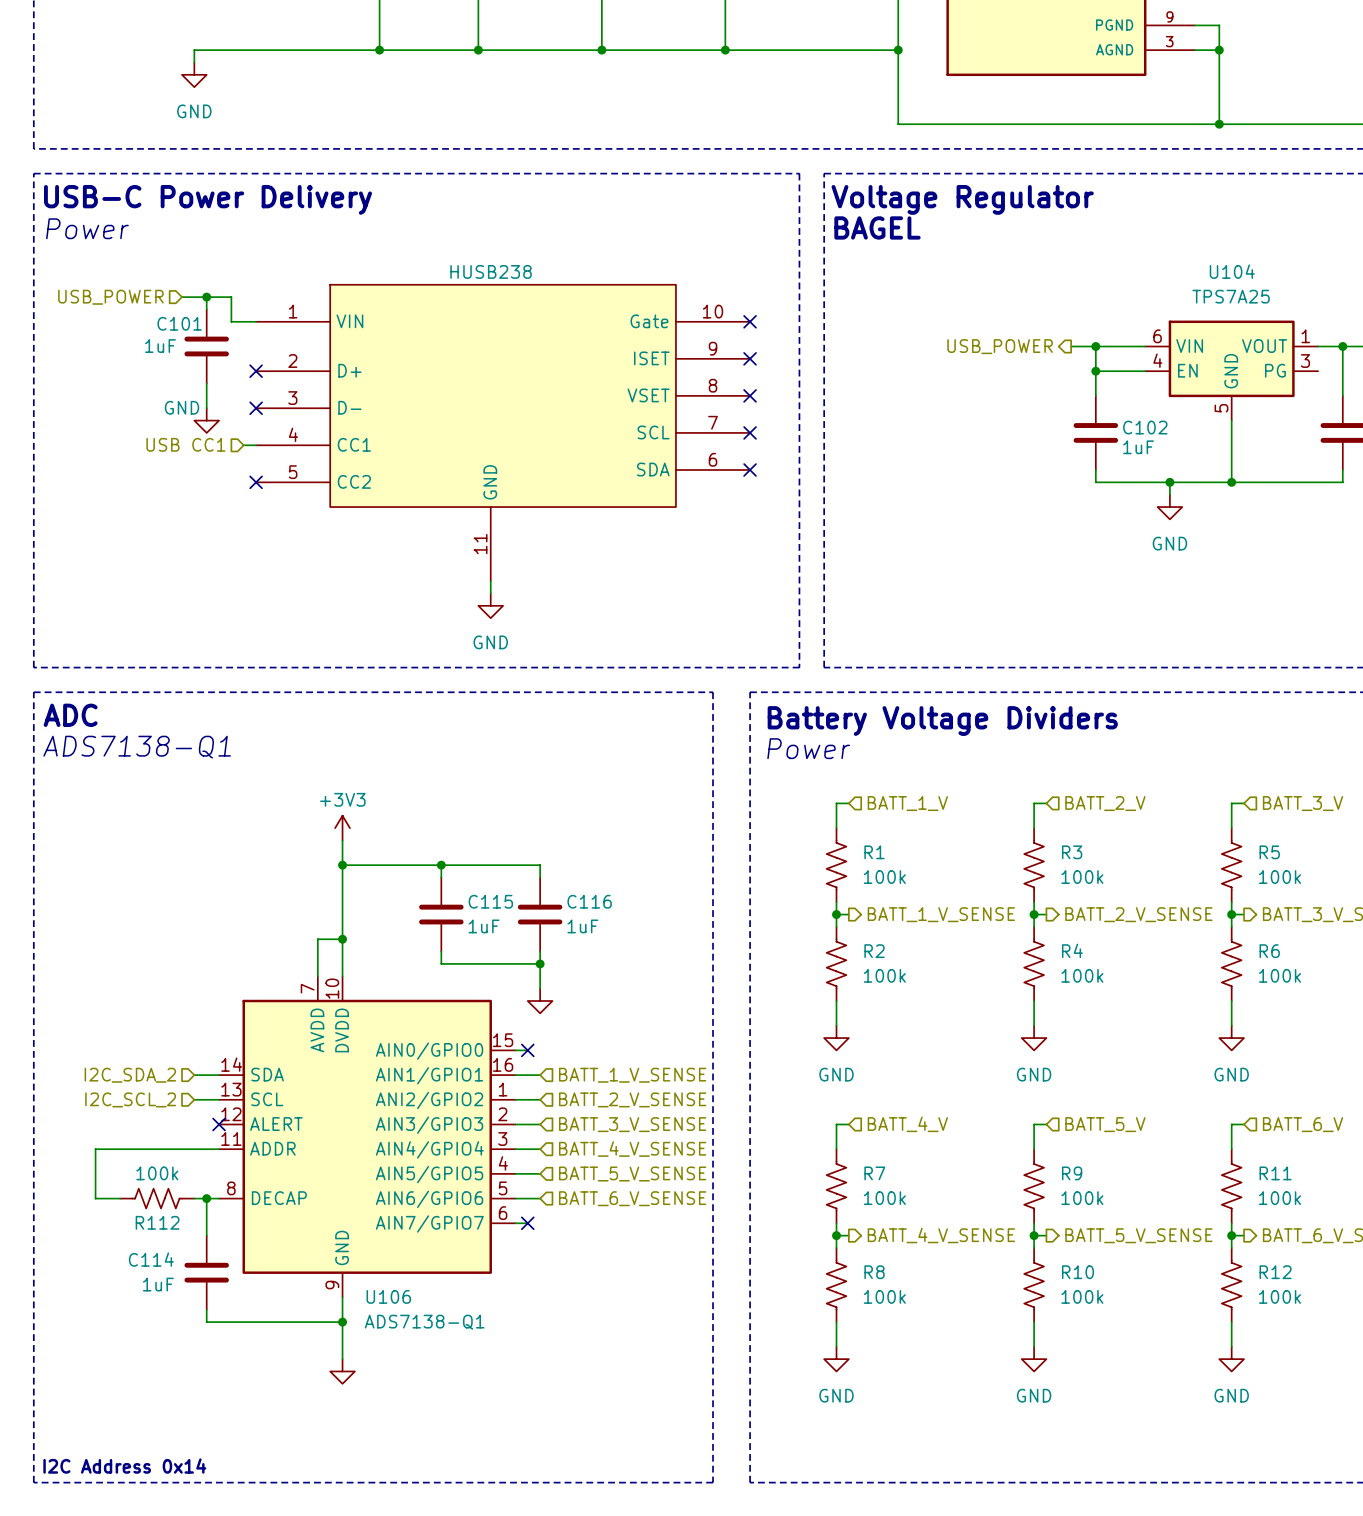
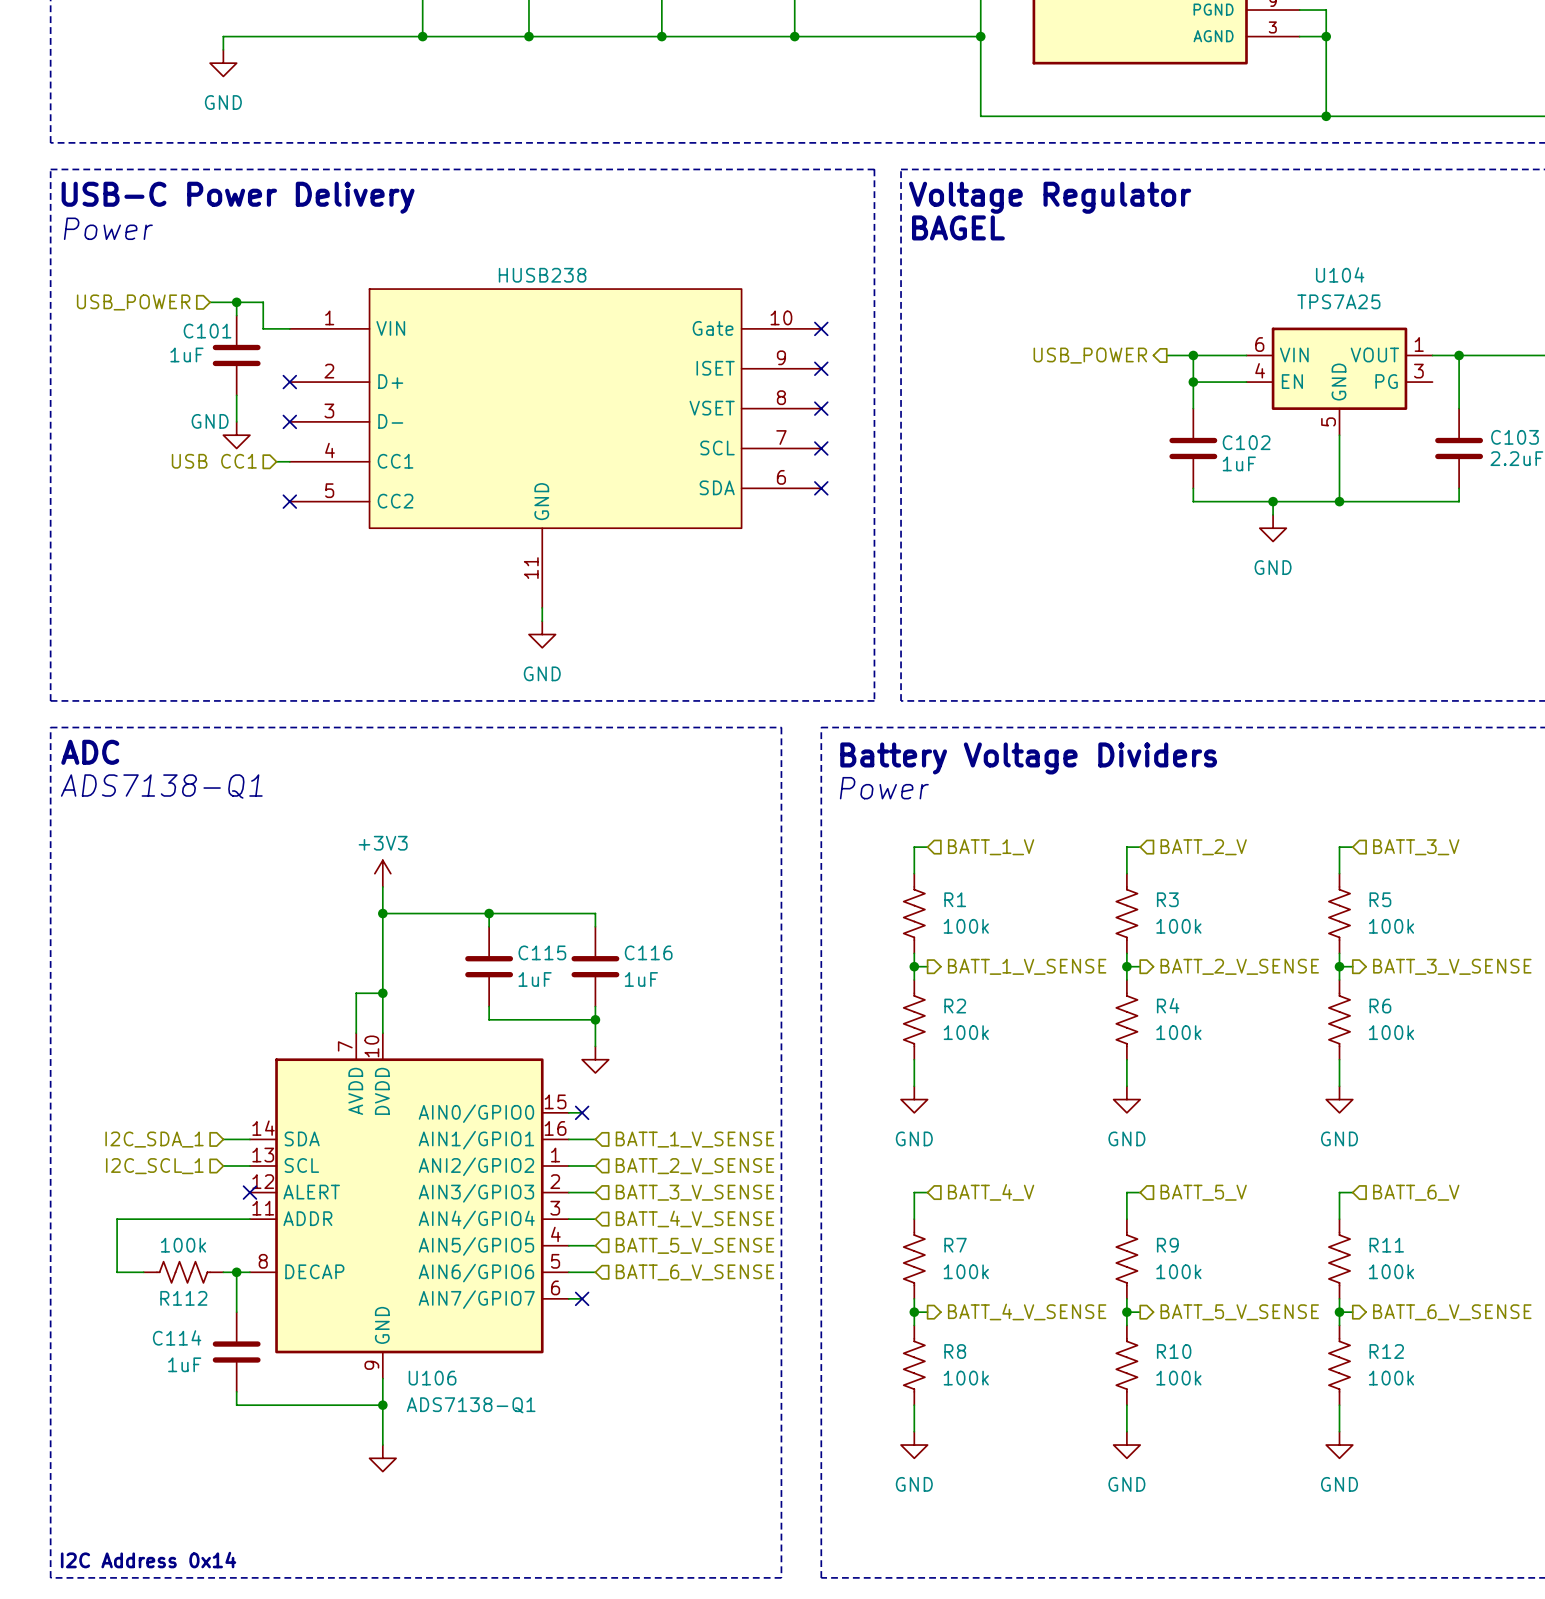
hierarchical label: I2C_SDA_2 (130, 1075) -> I2C_SDA_1 (154, 1139)
hierarchical label: I2C_SCL_2 (130, 1099) -> I2C_SCL_1 (154, 1166)

